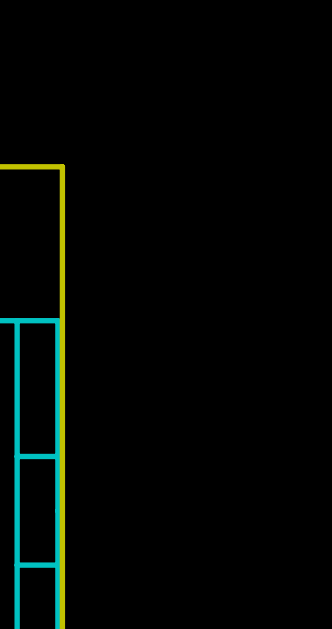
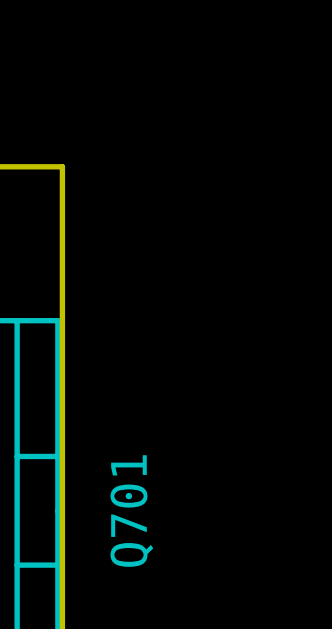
Q701 name: none -> Q701 (131, 511)

